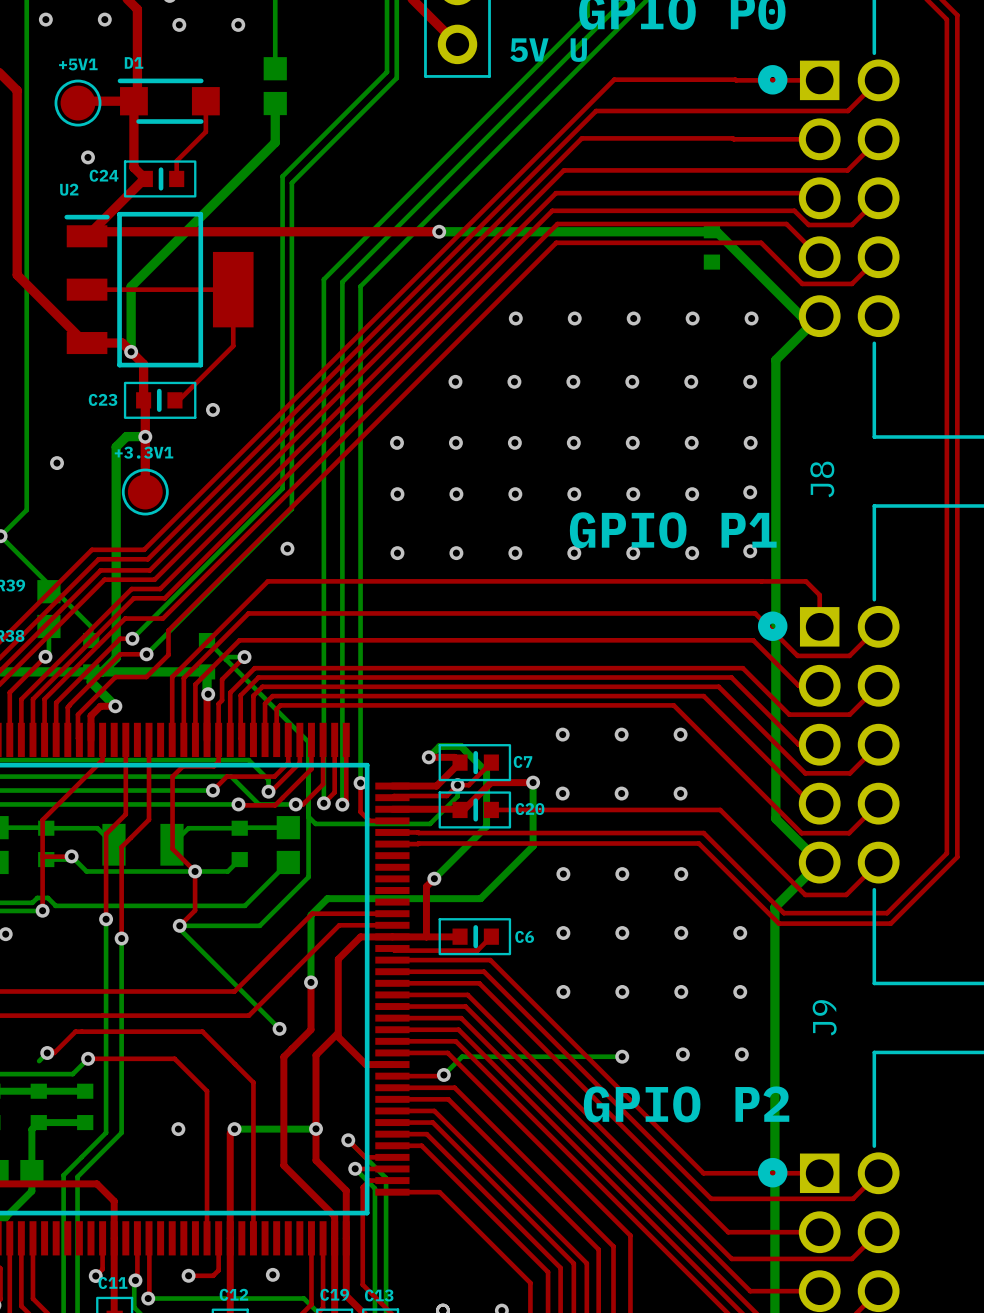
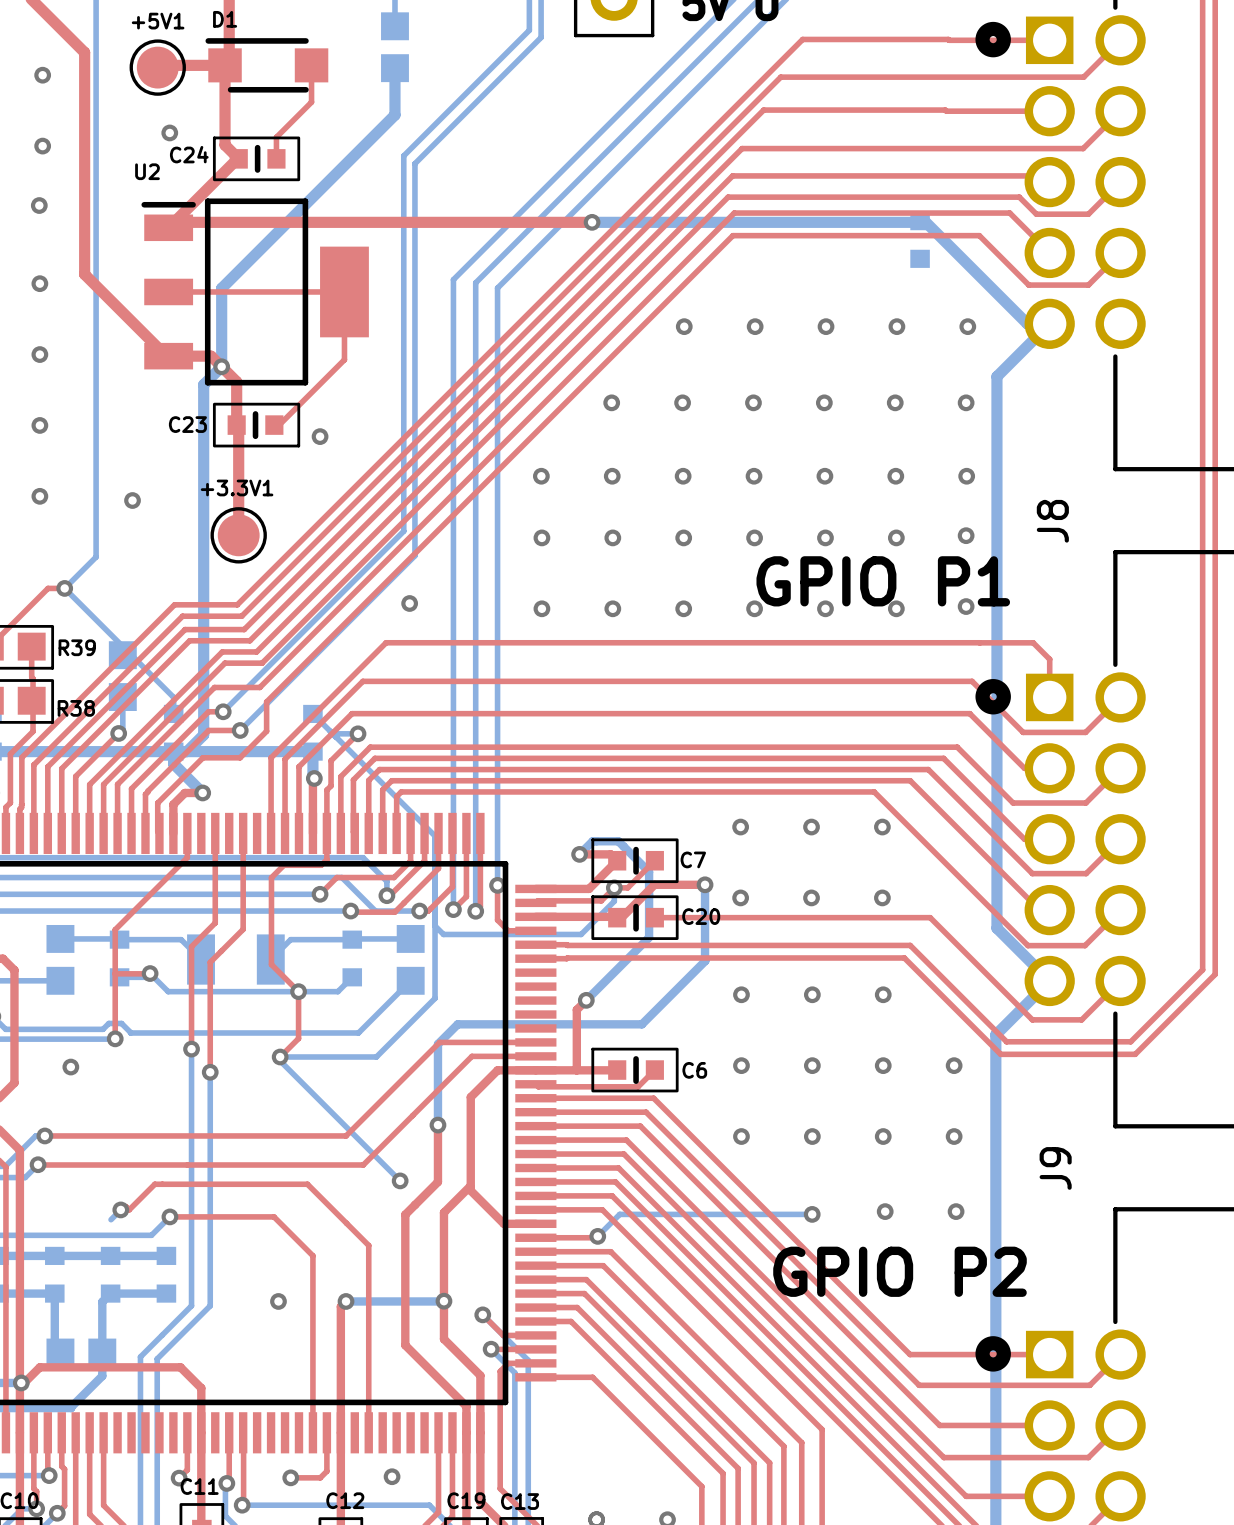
bottom track: (145, 436) (126, 436) (116, 446) -> (221, 366) (203, 384) (203, 481)
via: (145, 436) -> none

